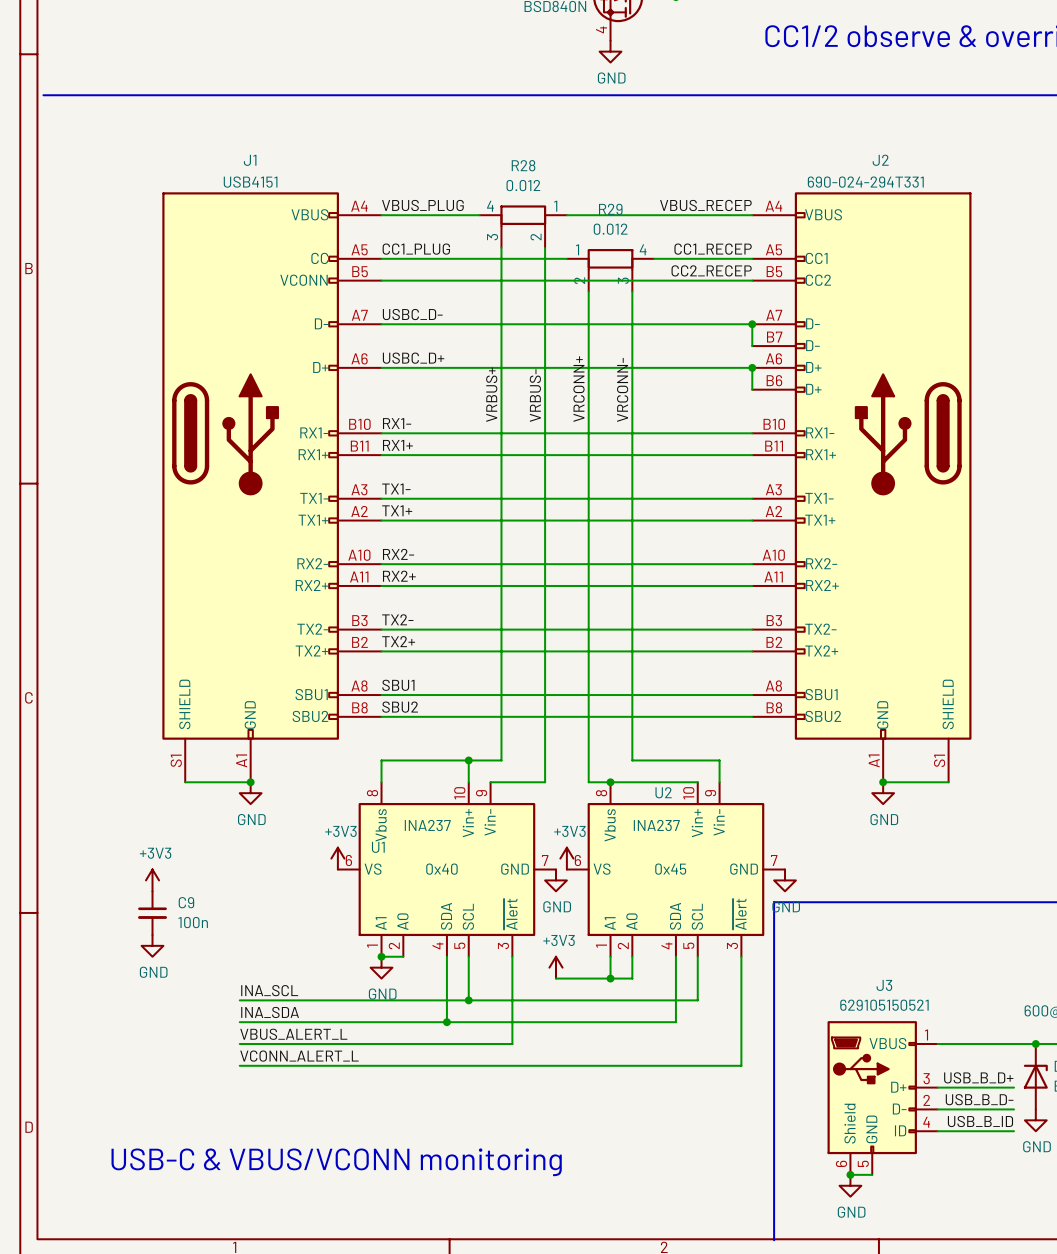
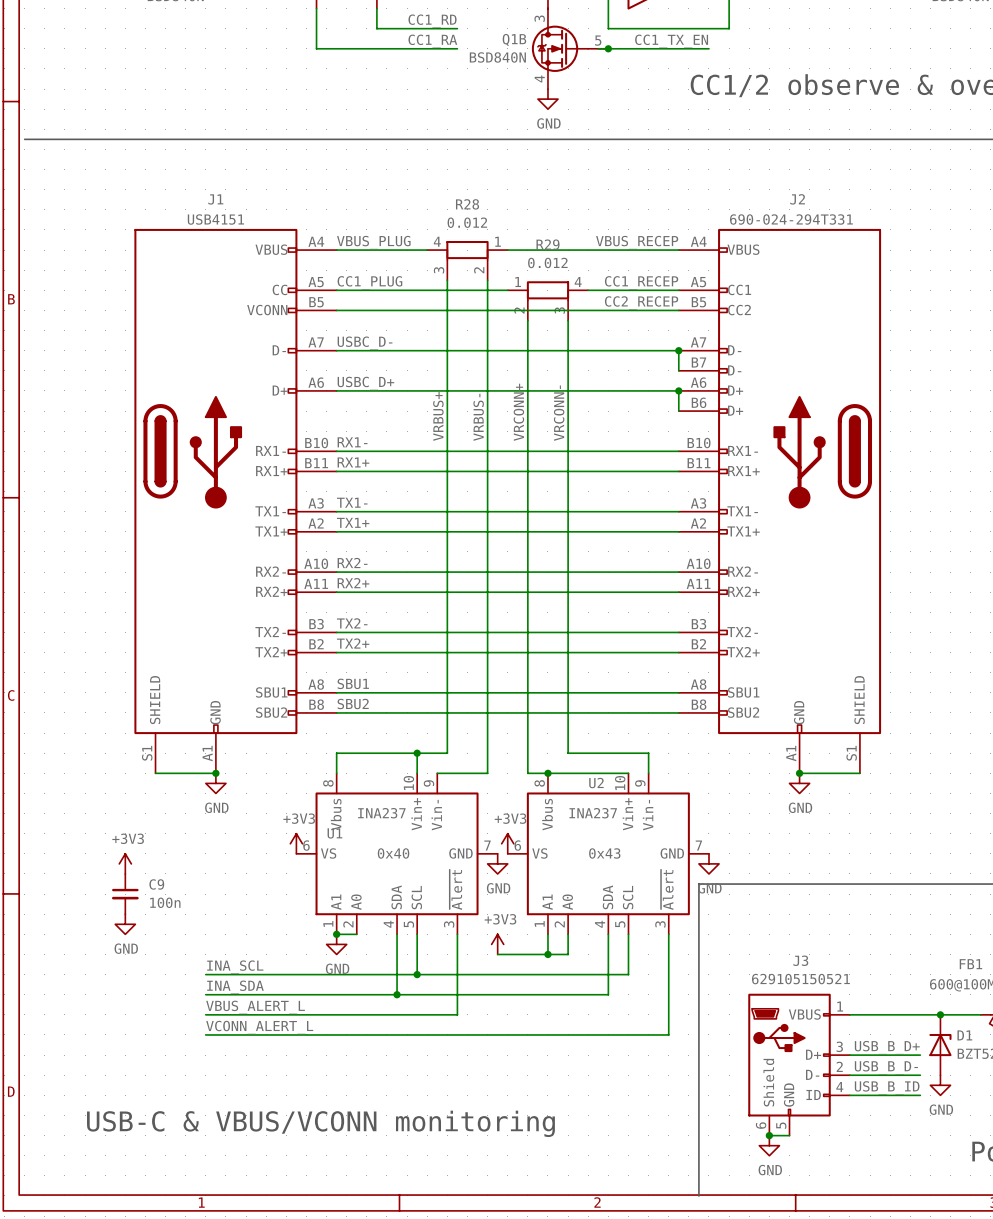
U2 text: 0x45 (670, 869) -> 0x43 (604, 853)

